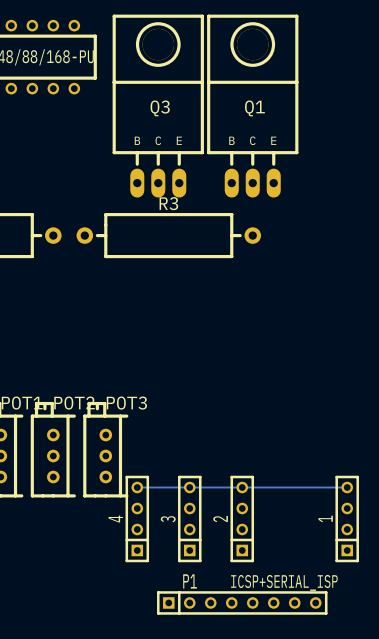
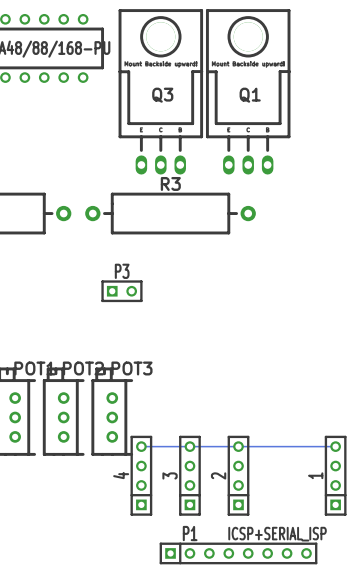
Q3 footprint: [112, 14, 204, 198] -> [118, 9, 204, 175]
Q1 footprint: [207, 14, 299, 198] -> [205, 9, 291, 175]
P3: none -> (121, 291)

